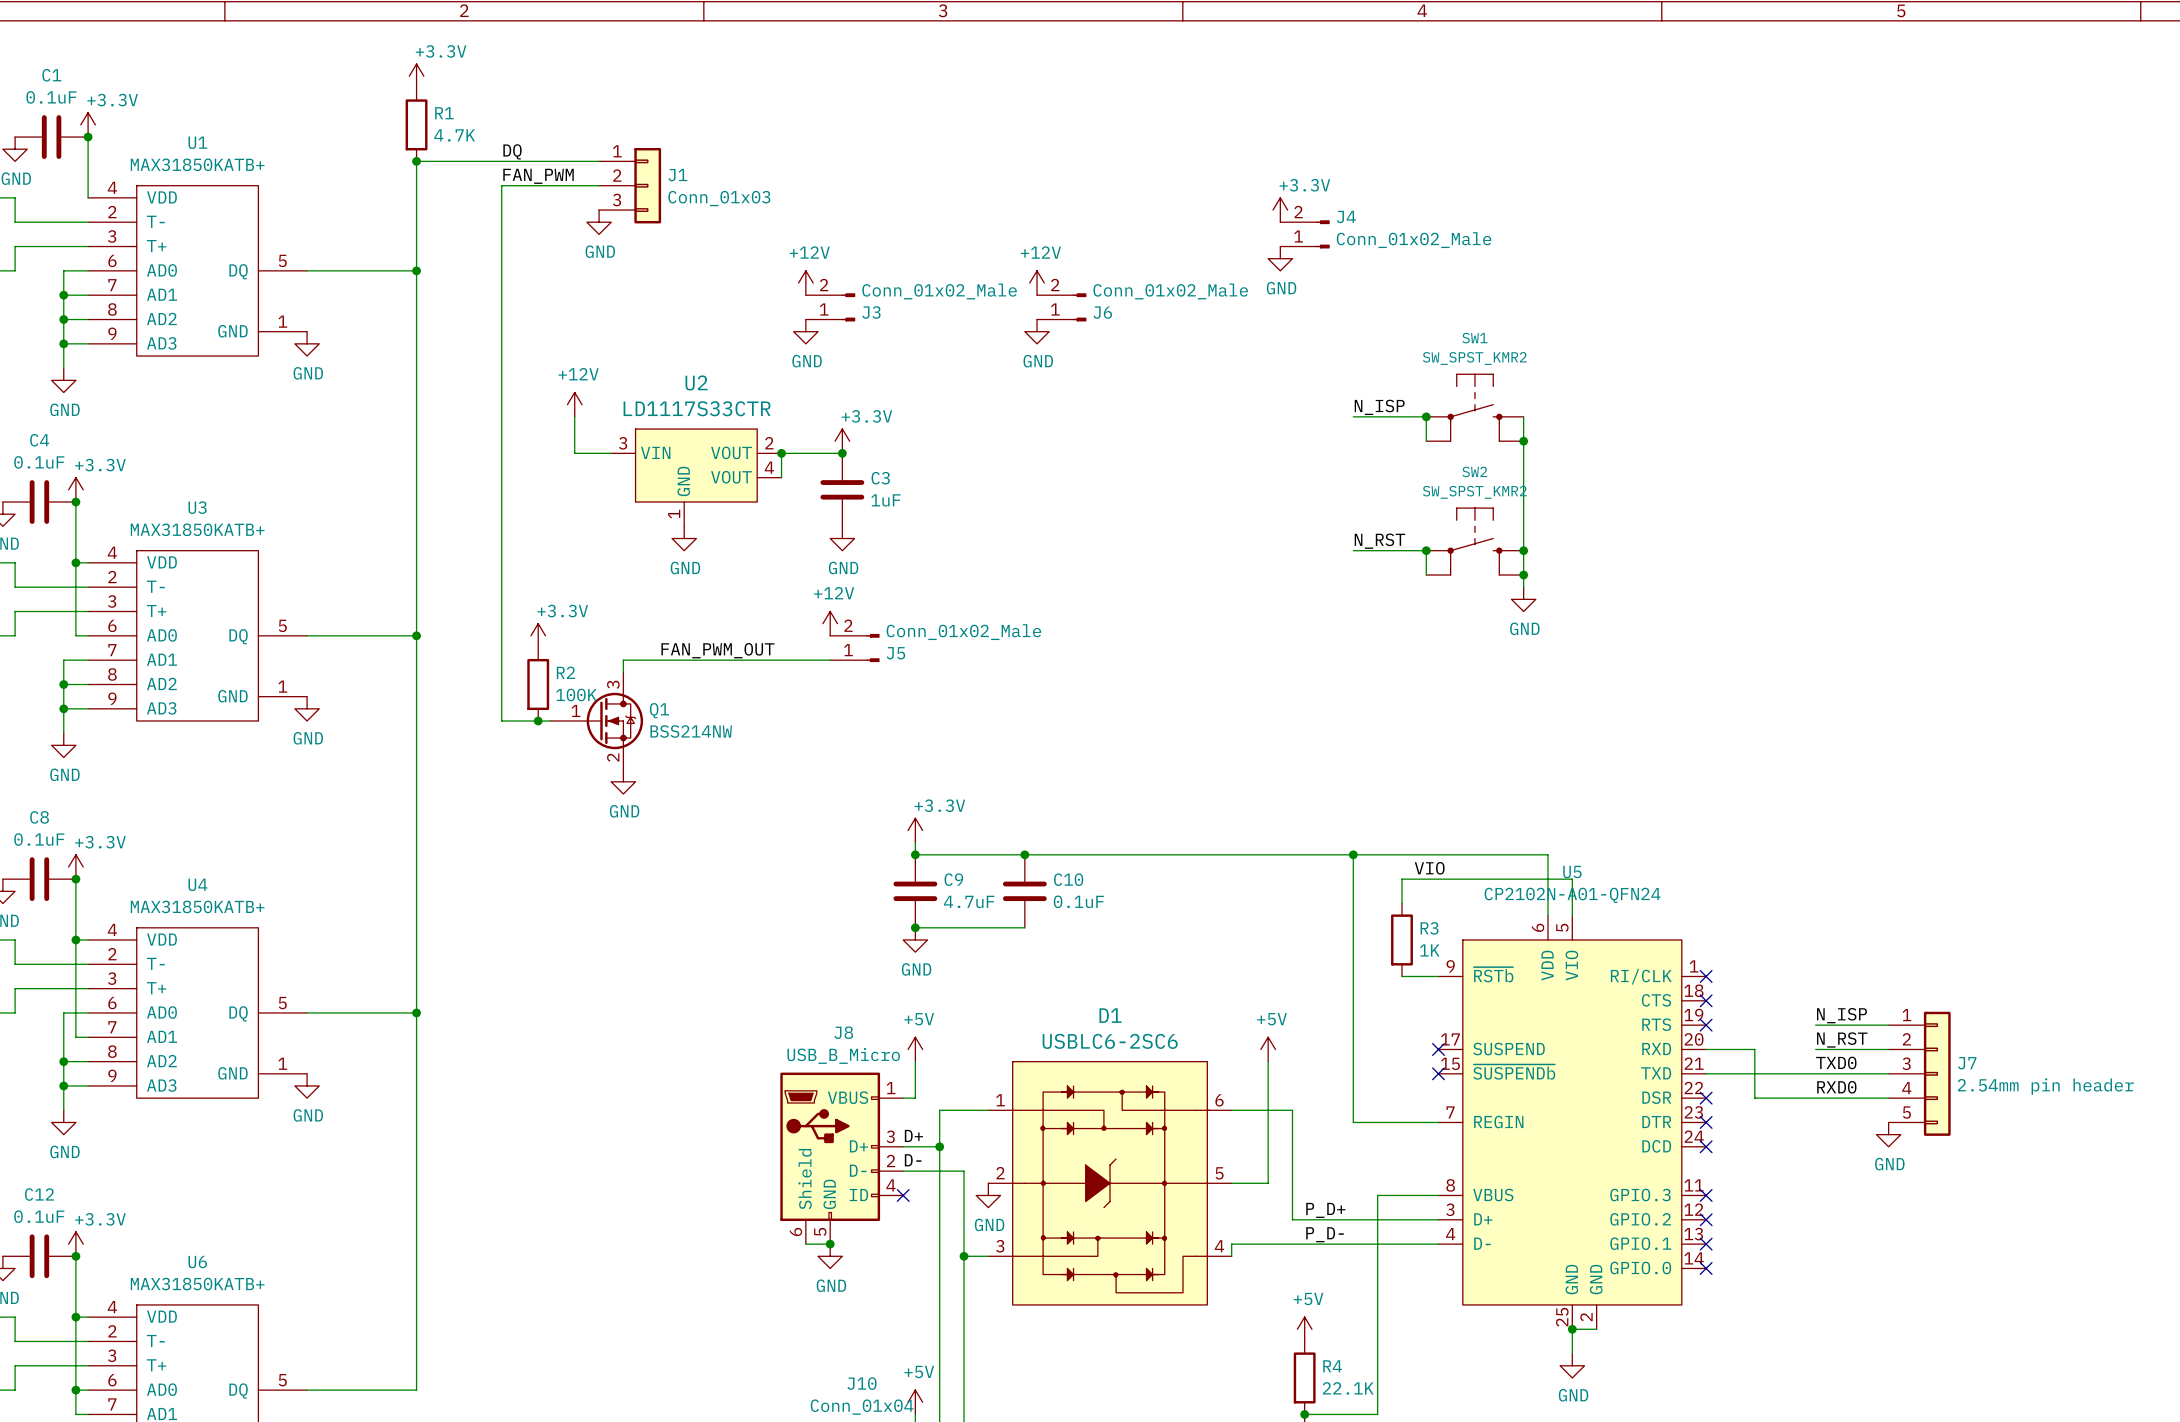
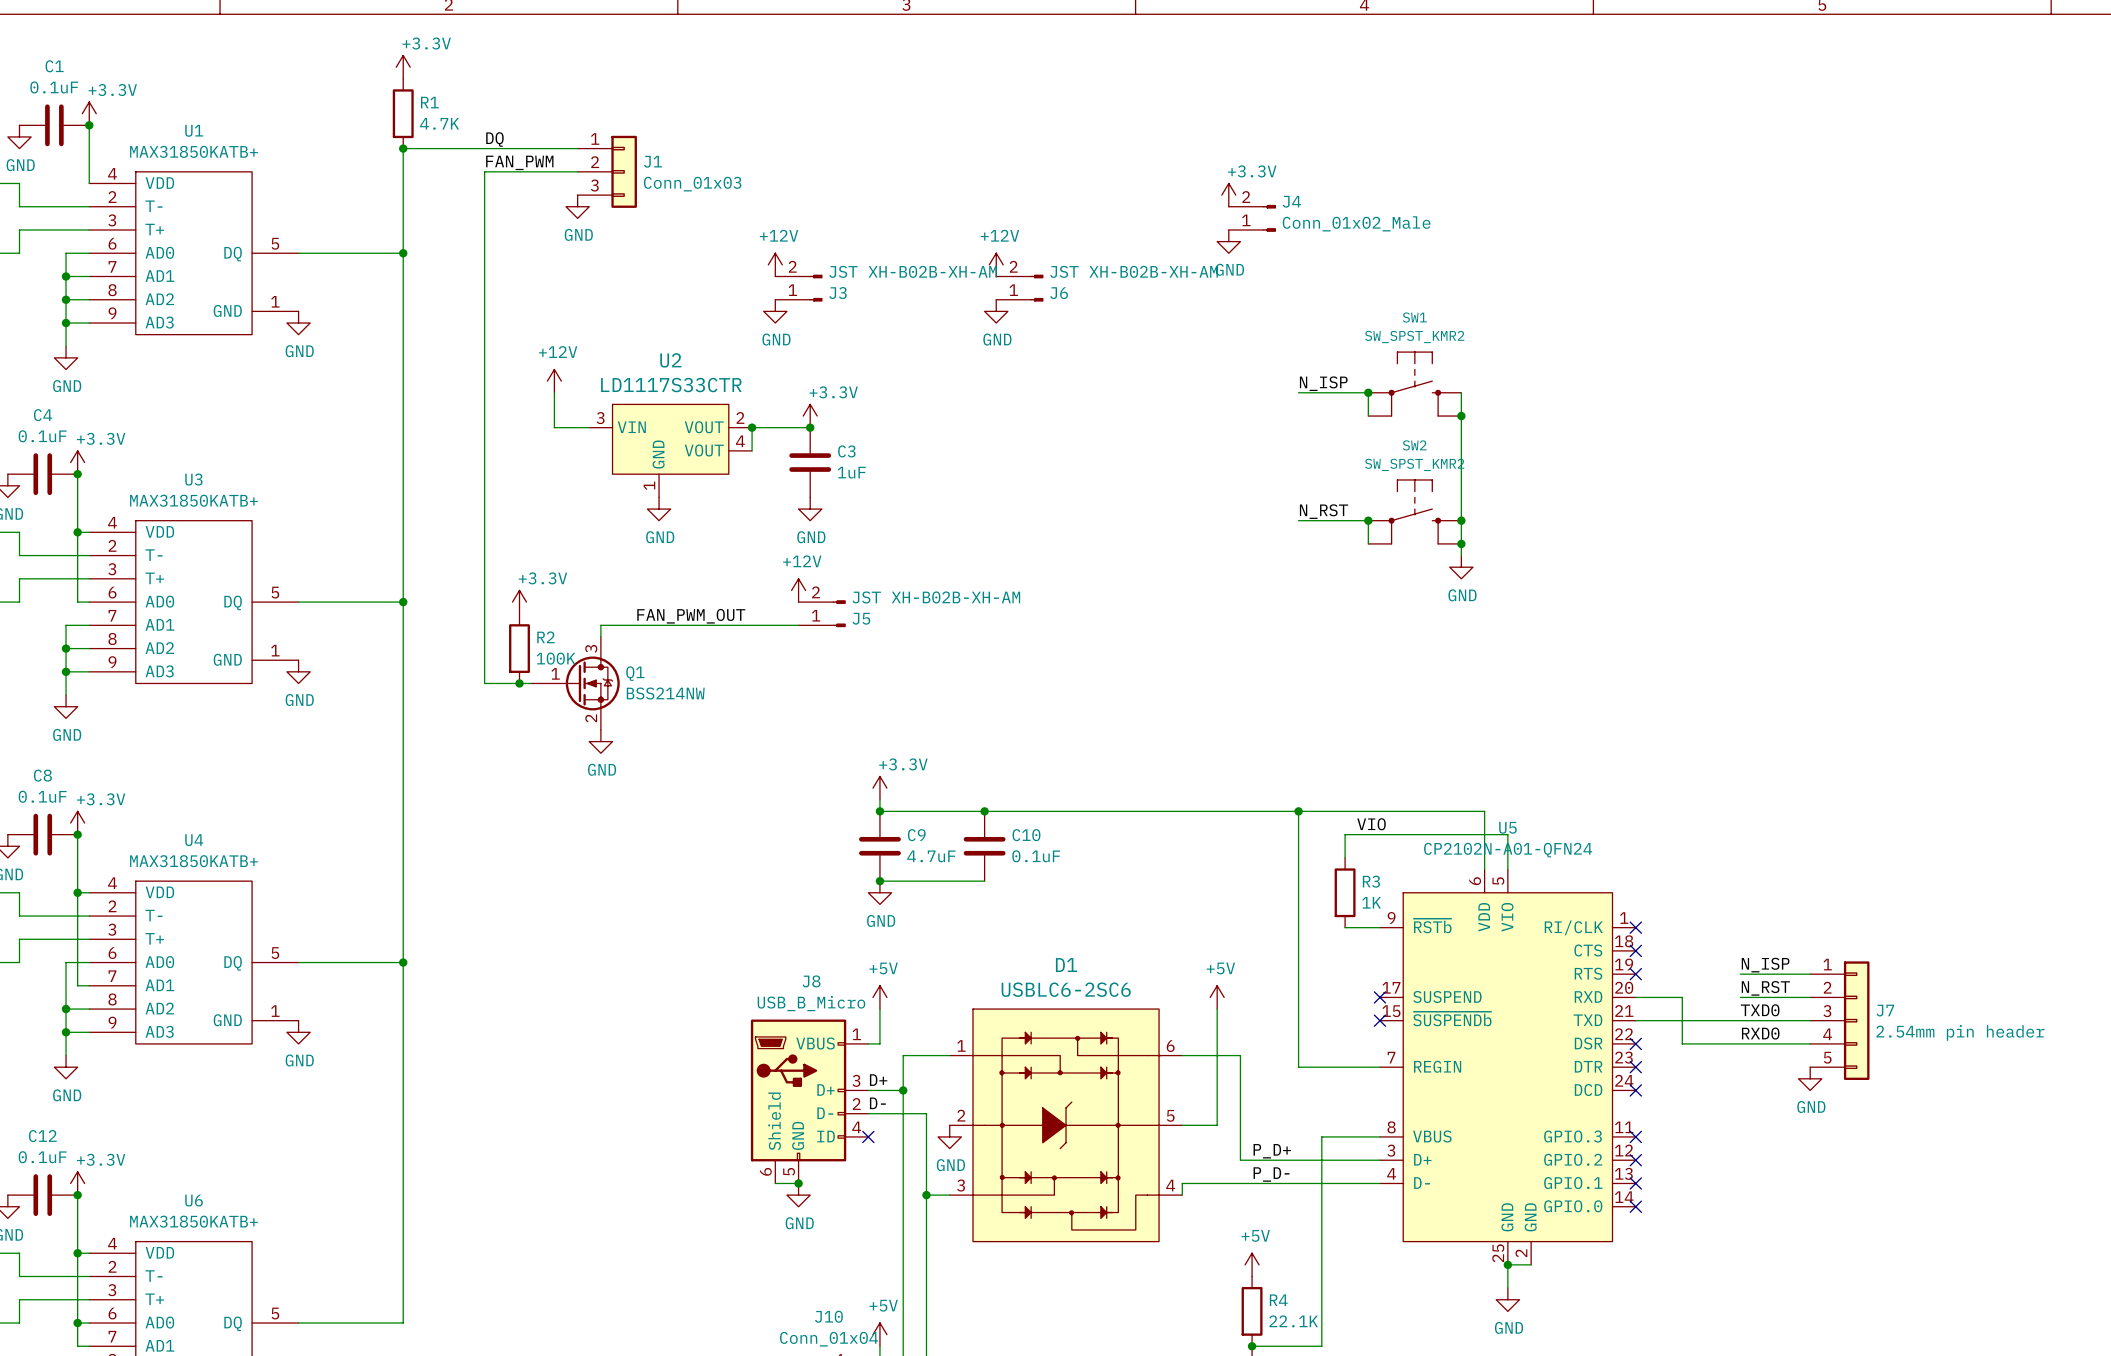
J3 value: Conn_01x02_Male (939, 291) -> JST XH-B02B-XH-AM (913, 271)
J6 value: Conn_01x02_Male (1170, 291) -> JST XH-B02B-XH-AM (1134, 271)
J5 value: Conn_01x02_Male (963, 632) -> JST XH-B02B-XH-AM (936, 597)

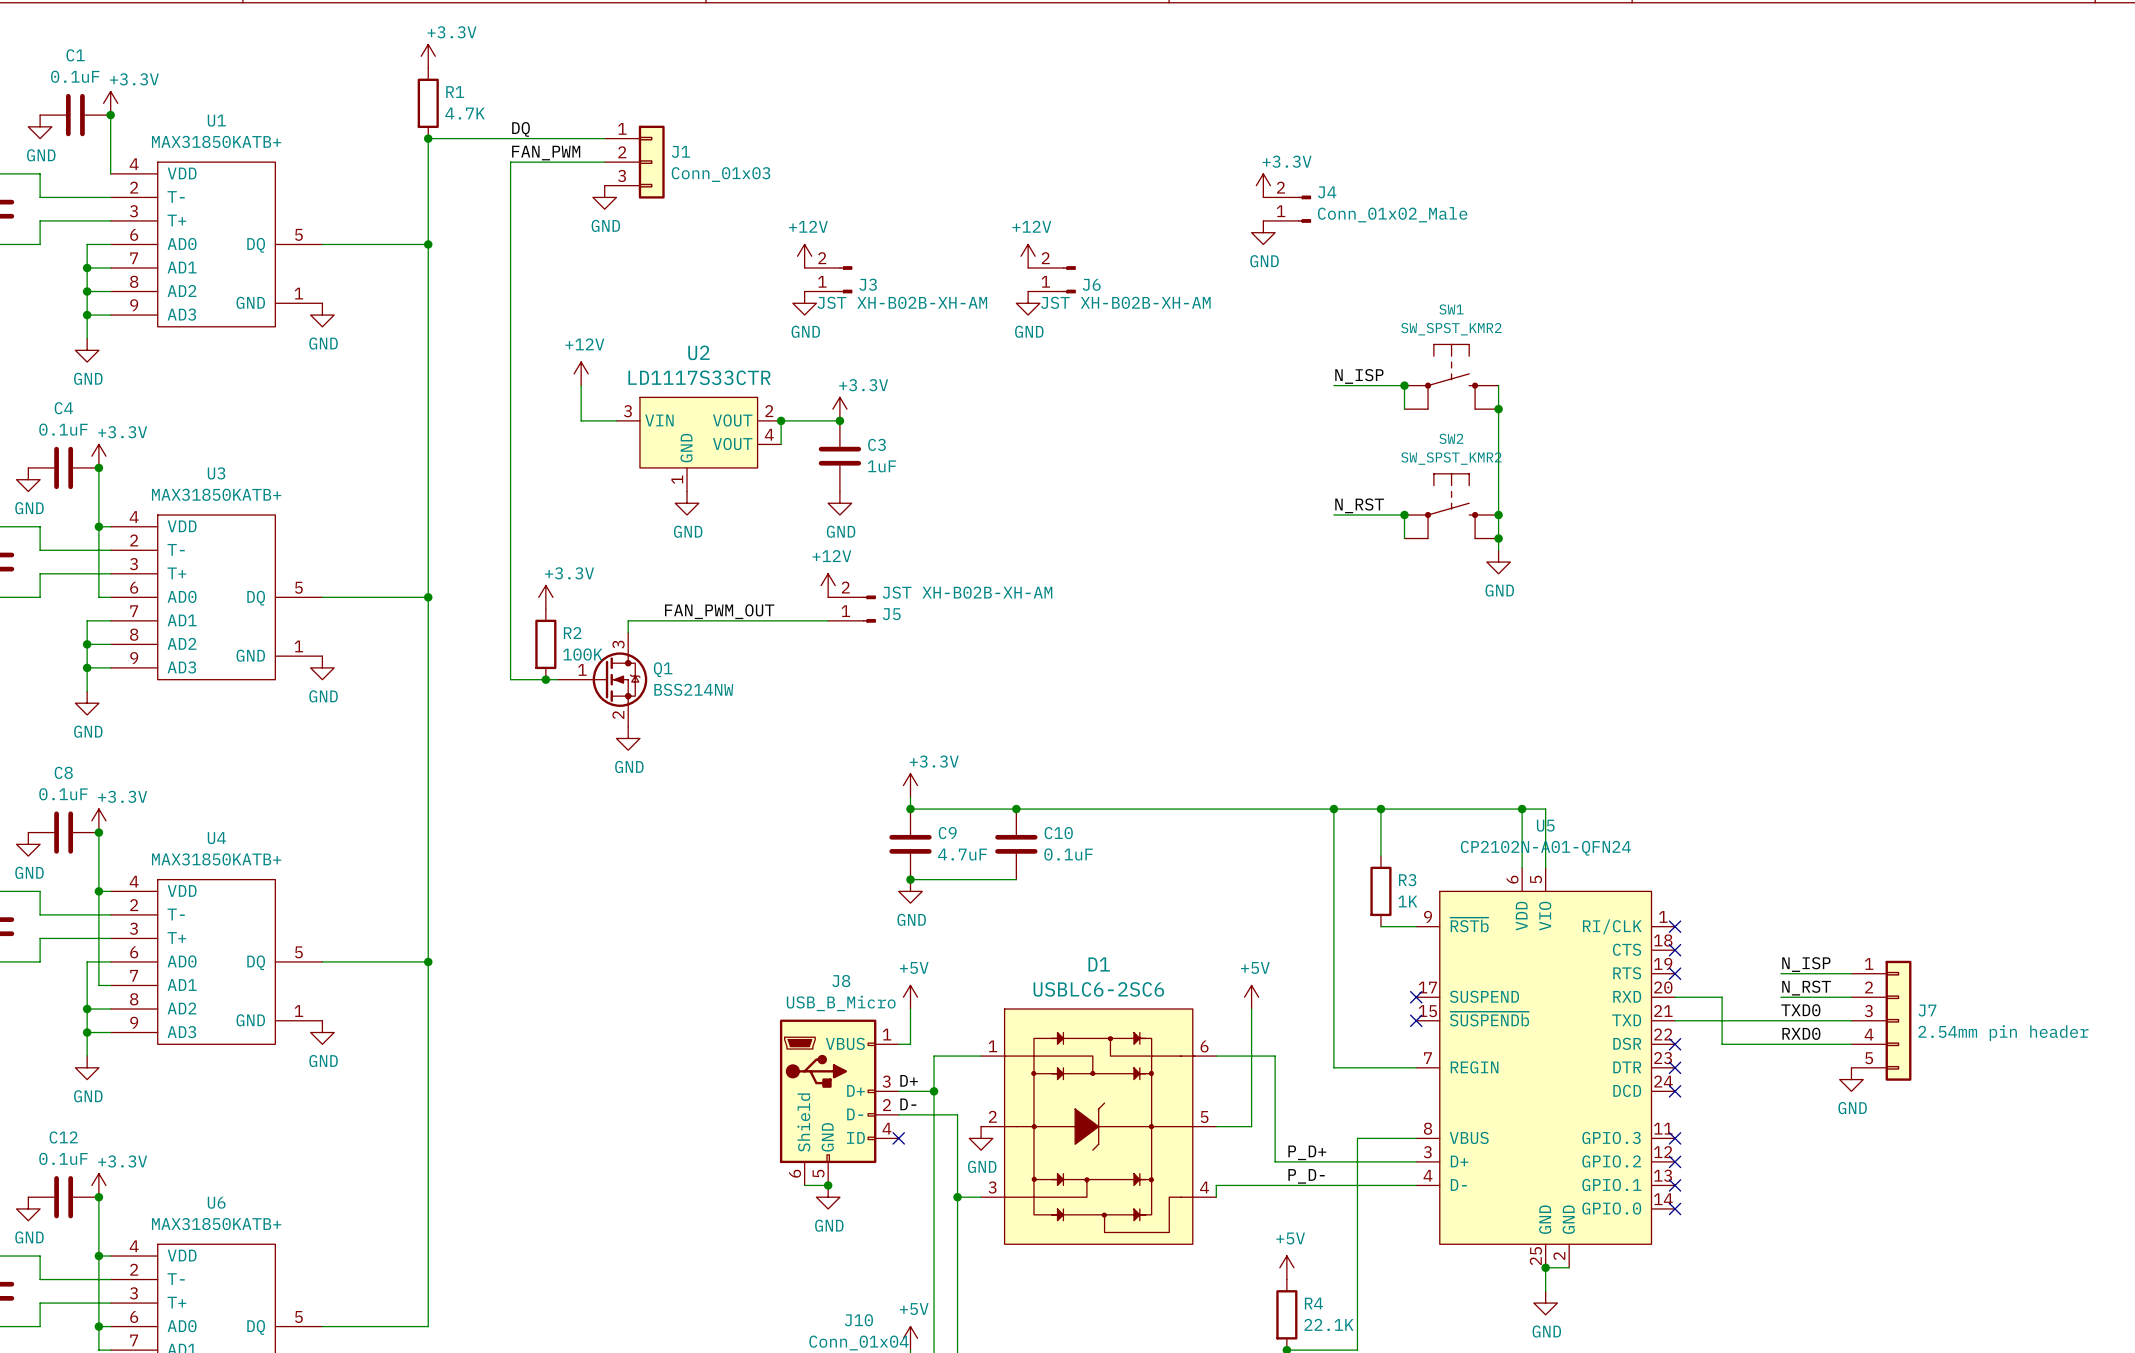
J3 value position: JST XH-B02B-XH-AM (913, 271) -> JST XH-B02B-XH-AM (902, 302)
J6 value position: JST XH-B02B-XH-AM (1134, 271) -> JST XH-B02B-XH-AM (1125, 302)
wire: none -> (1380, 809) (1380, 832)
junction: none -> (1380, 809)
junction: none -> (1522, 809)
label: VIO (1371, 824) -> none
wire: (1345, 834) (1507, 834) -> (1522, 809) (1545, 809) (1545, 832)

